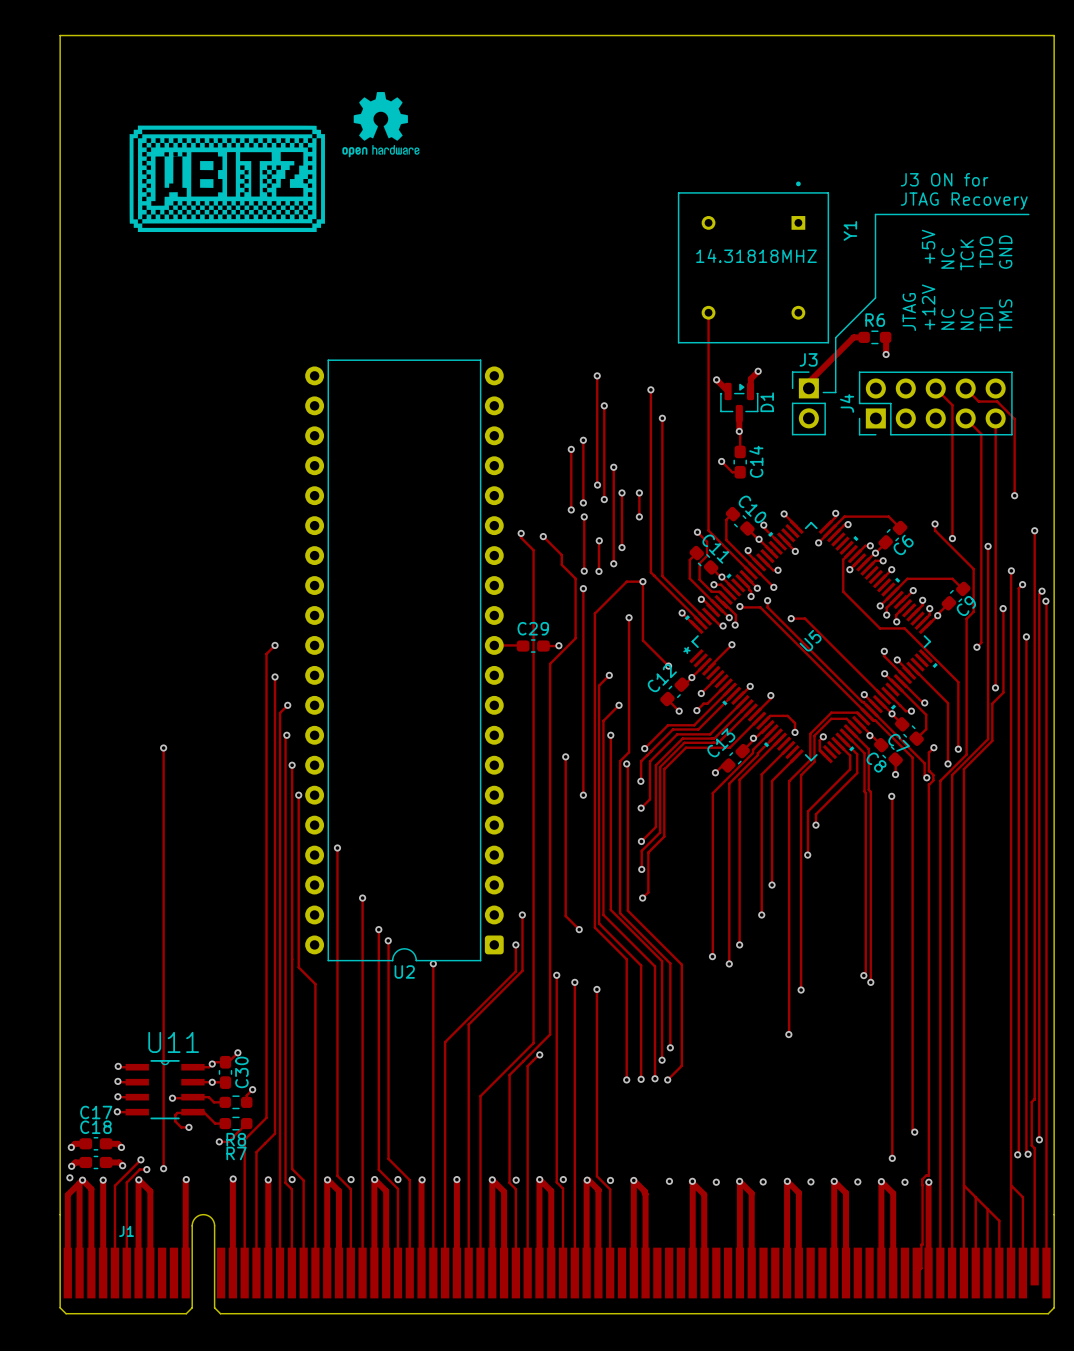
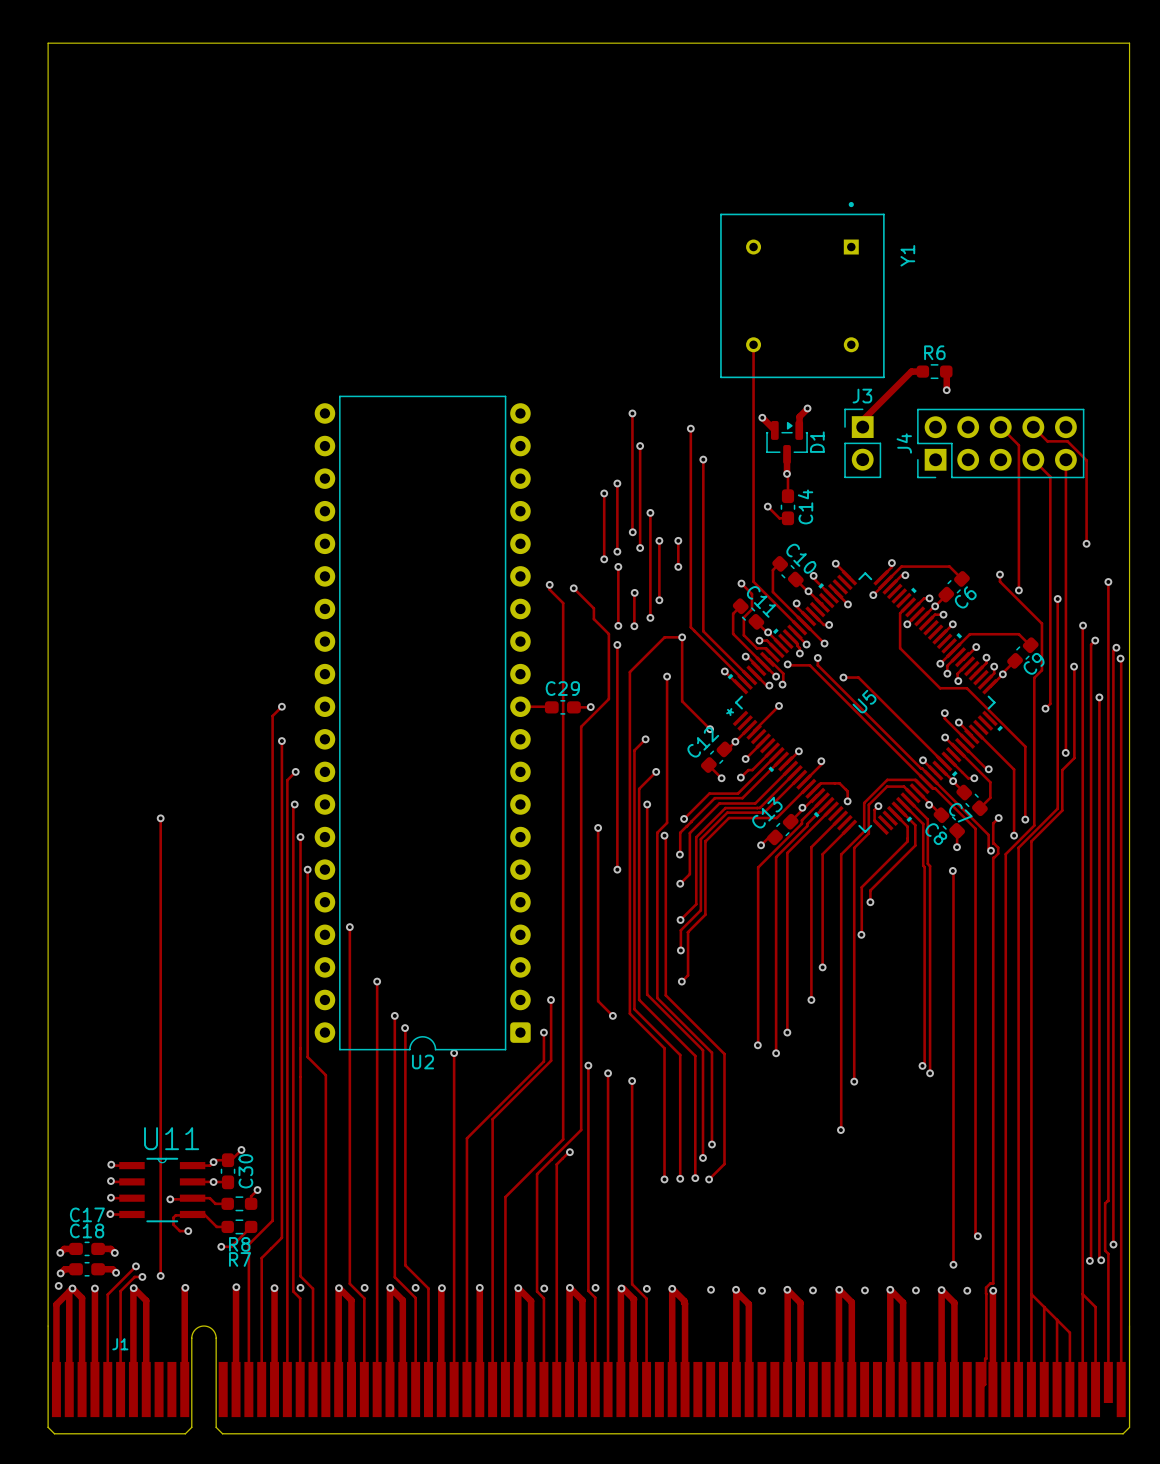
drawing: [342, 91, 420, 158] -> none
drawing: [129, 125, 325, 233] -> none
text: J3 ON for (944, 179) -> none
text: JTAG Recovery (964, 201) -> none
line: (1028, 214) (875, 214) (875, 297) (835, 337) (835, 392) (823, 392) -> none
text: 14.31818MHZ (756, 255) -> none
text: +12V +5V (928, 279) -> none
text: TMS GND (1005, 283) -> none
text: NC TCK (967, 284) -> none
text: TDI TDO (986, 284) -> none
text: NC NC (947, 288) -> none
text: JTAG (909, 312) -> none

